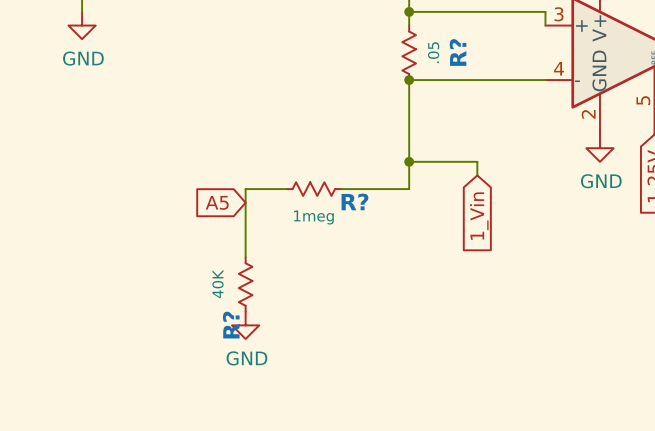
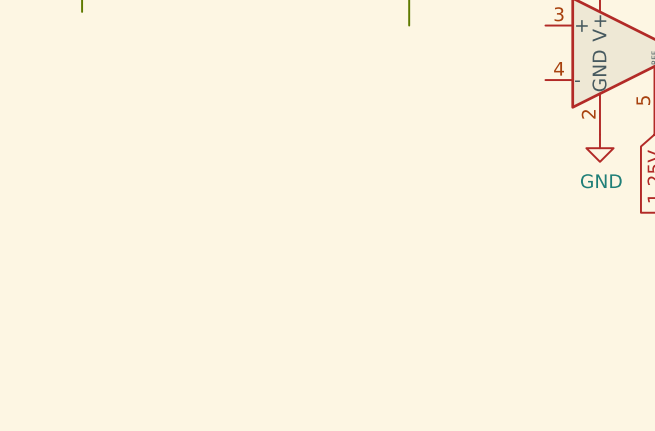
wire: (409, 11) (545, 11) (545, 25) -> none
junction: (409, 11) -> none
power symbol: GND (82, 25) -> none
R?: .05 (409, 52) -> none
junction: (409, 80) -> none
wire: (545, 80) (409, 80) (409, 189) (341, 189) -> none
wire: (409, 161) (477, 161) (477, 175) -> none
junction: (409, 161) -> none
wire: (286, 189) (245, 189) (245, 257) -> none
R?: 1meg (313, 189) -> none
global label: A5 (217, 202) -> none
global label: 1_Vin (479, 216) -> none
R?: 40K (245, 284) -> none
power symbol: GND (245, 325) -> none

